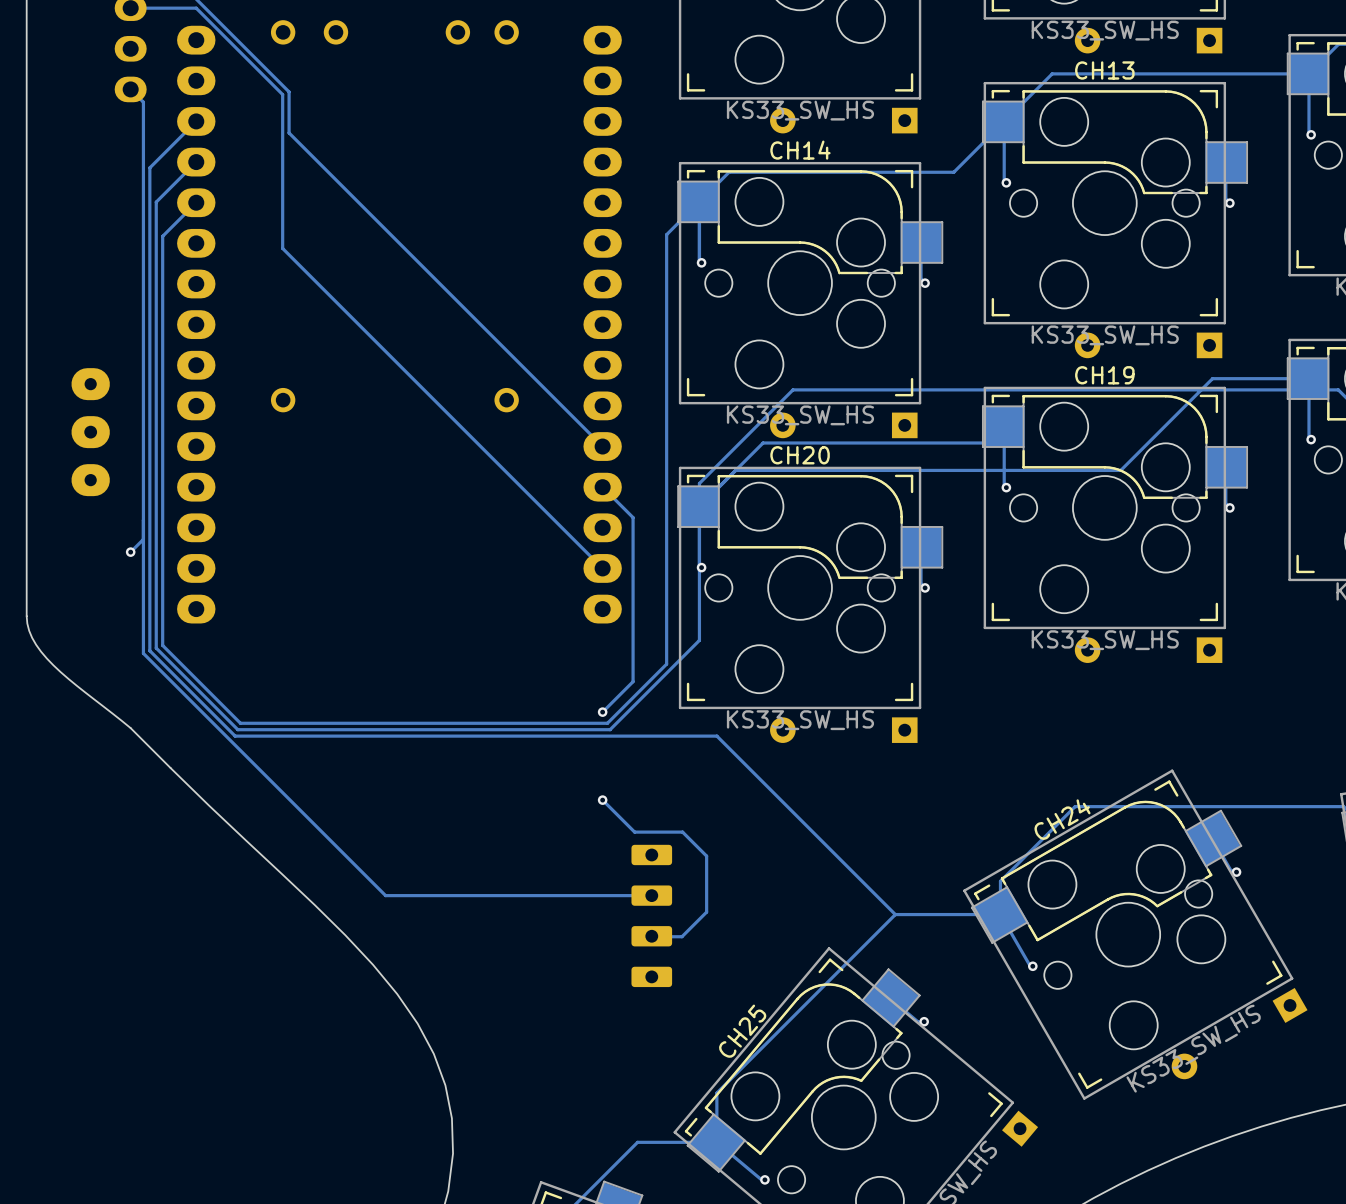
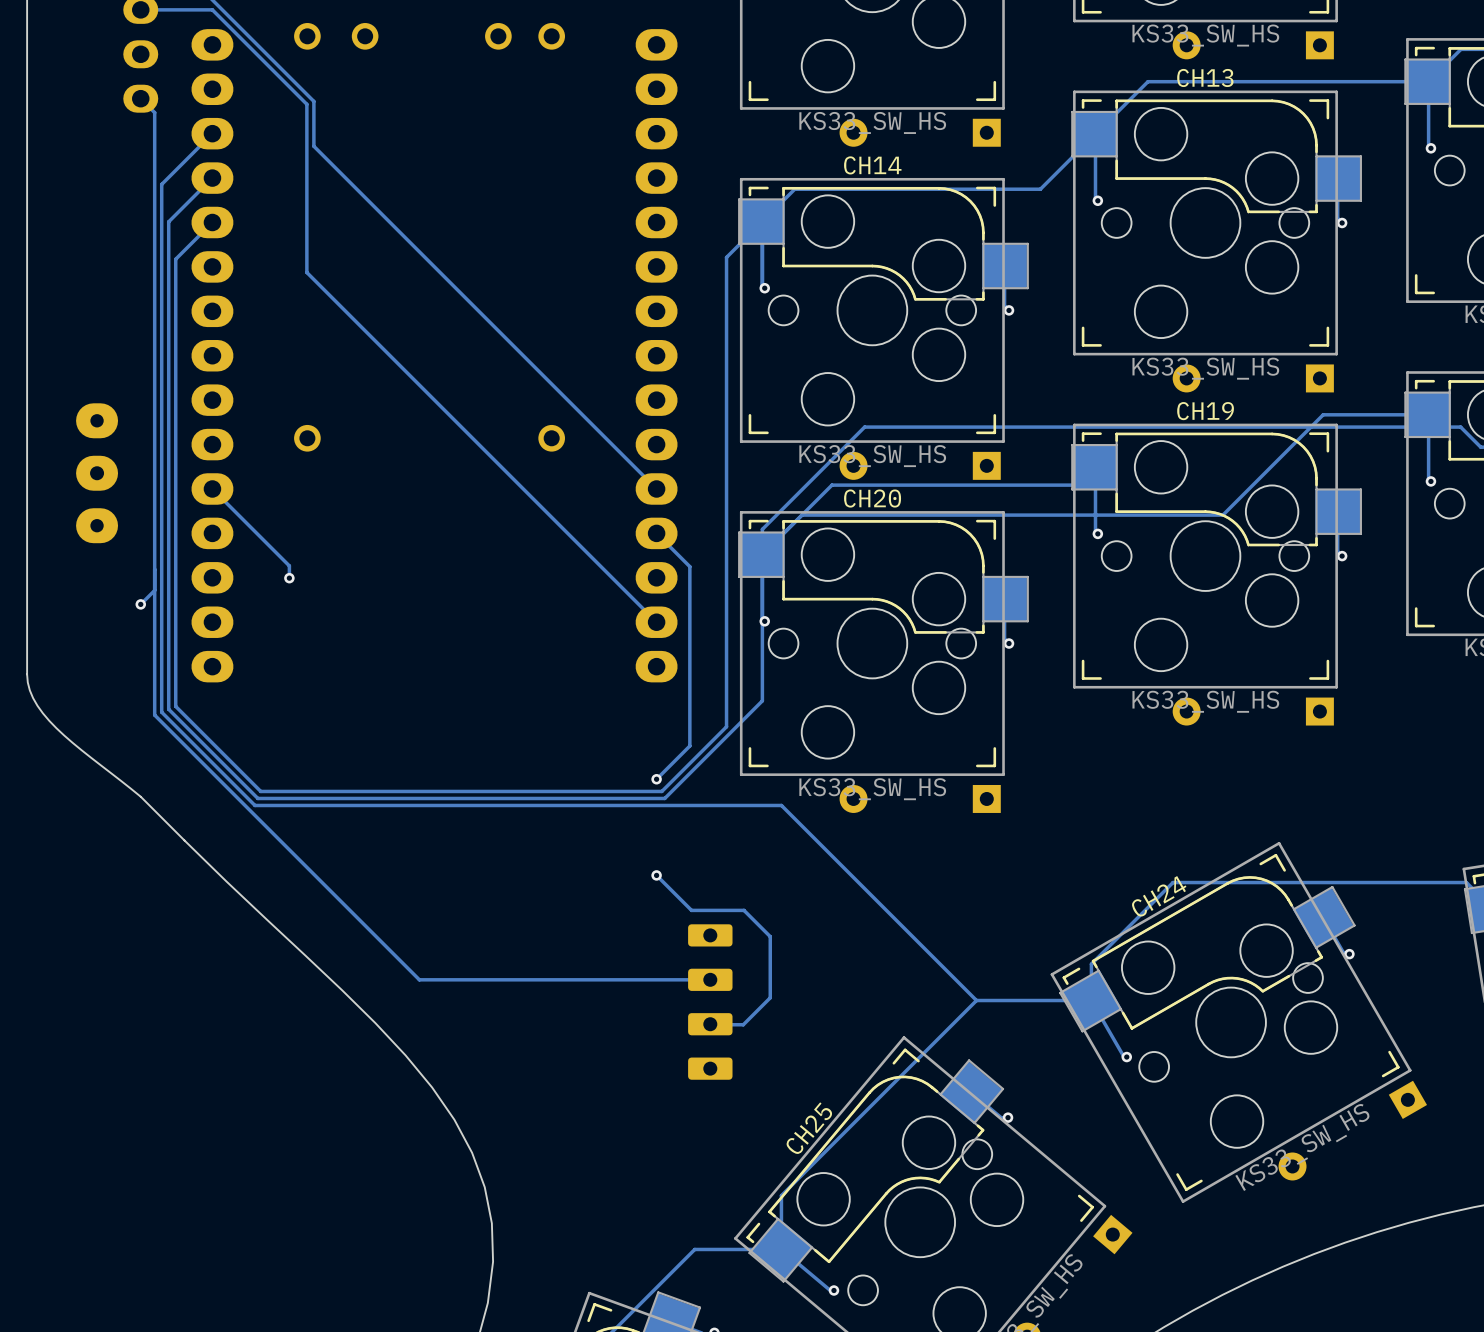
track: none -> (212, 488) (289, 565) (289, 578)
via: none -> (289, 578)

